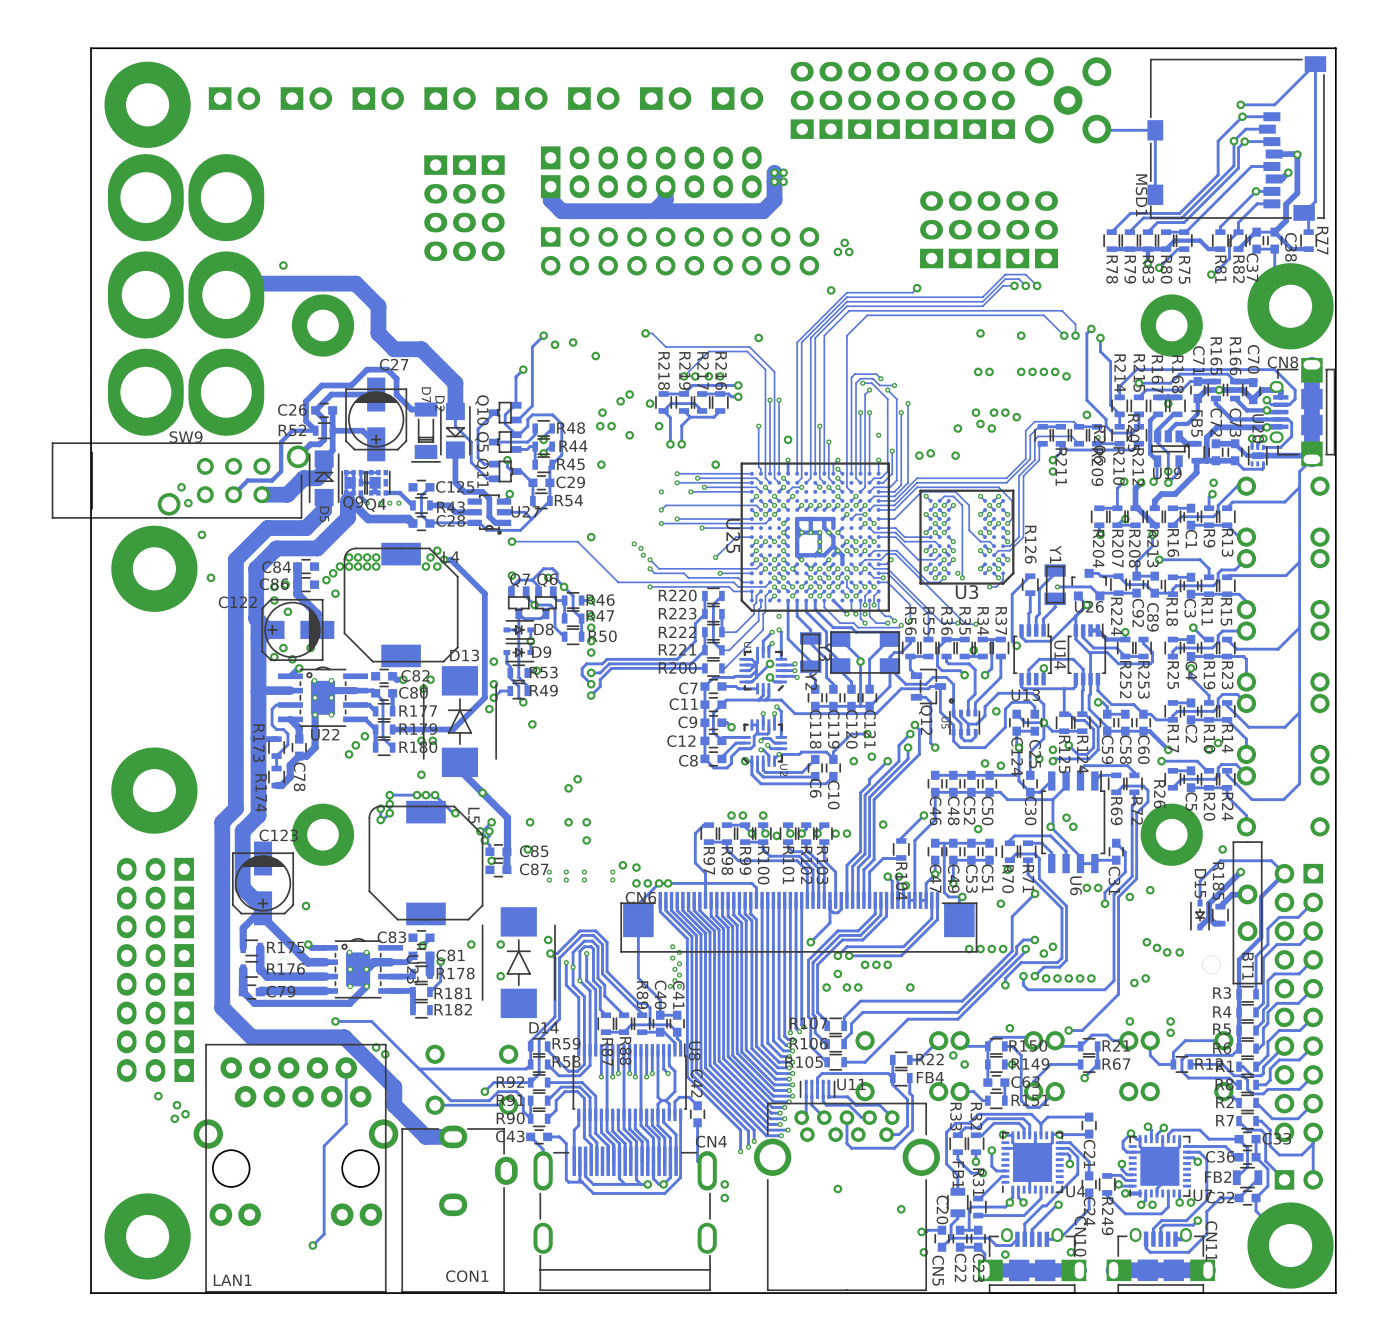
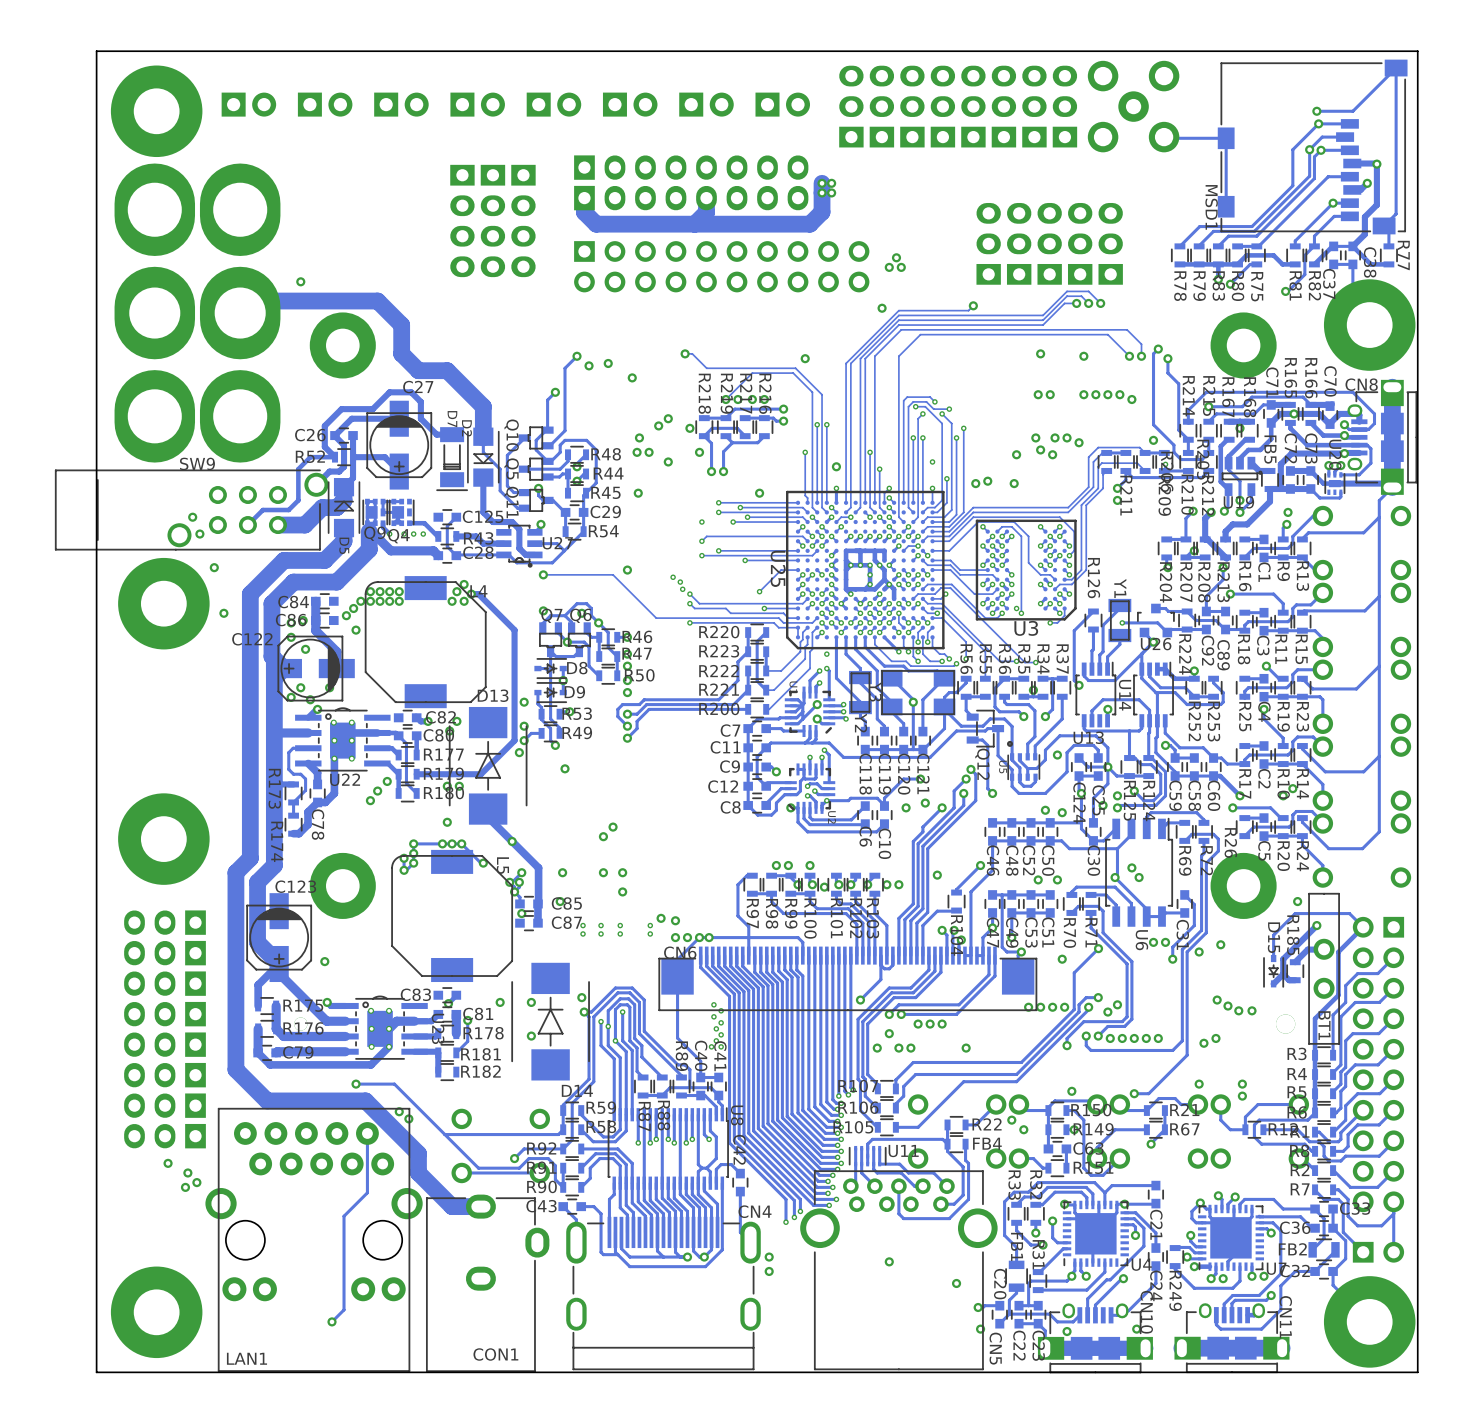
via position: (1007, 869) -> (1057, 879)

